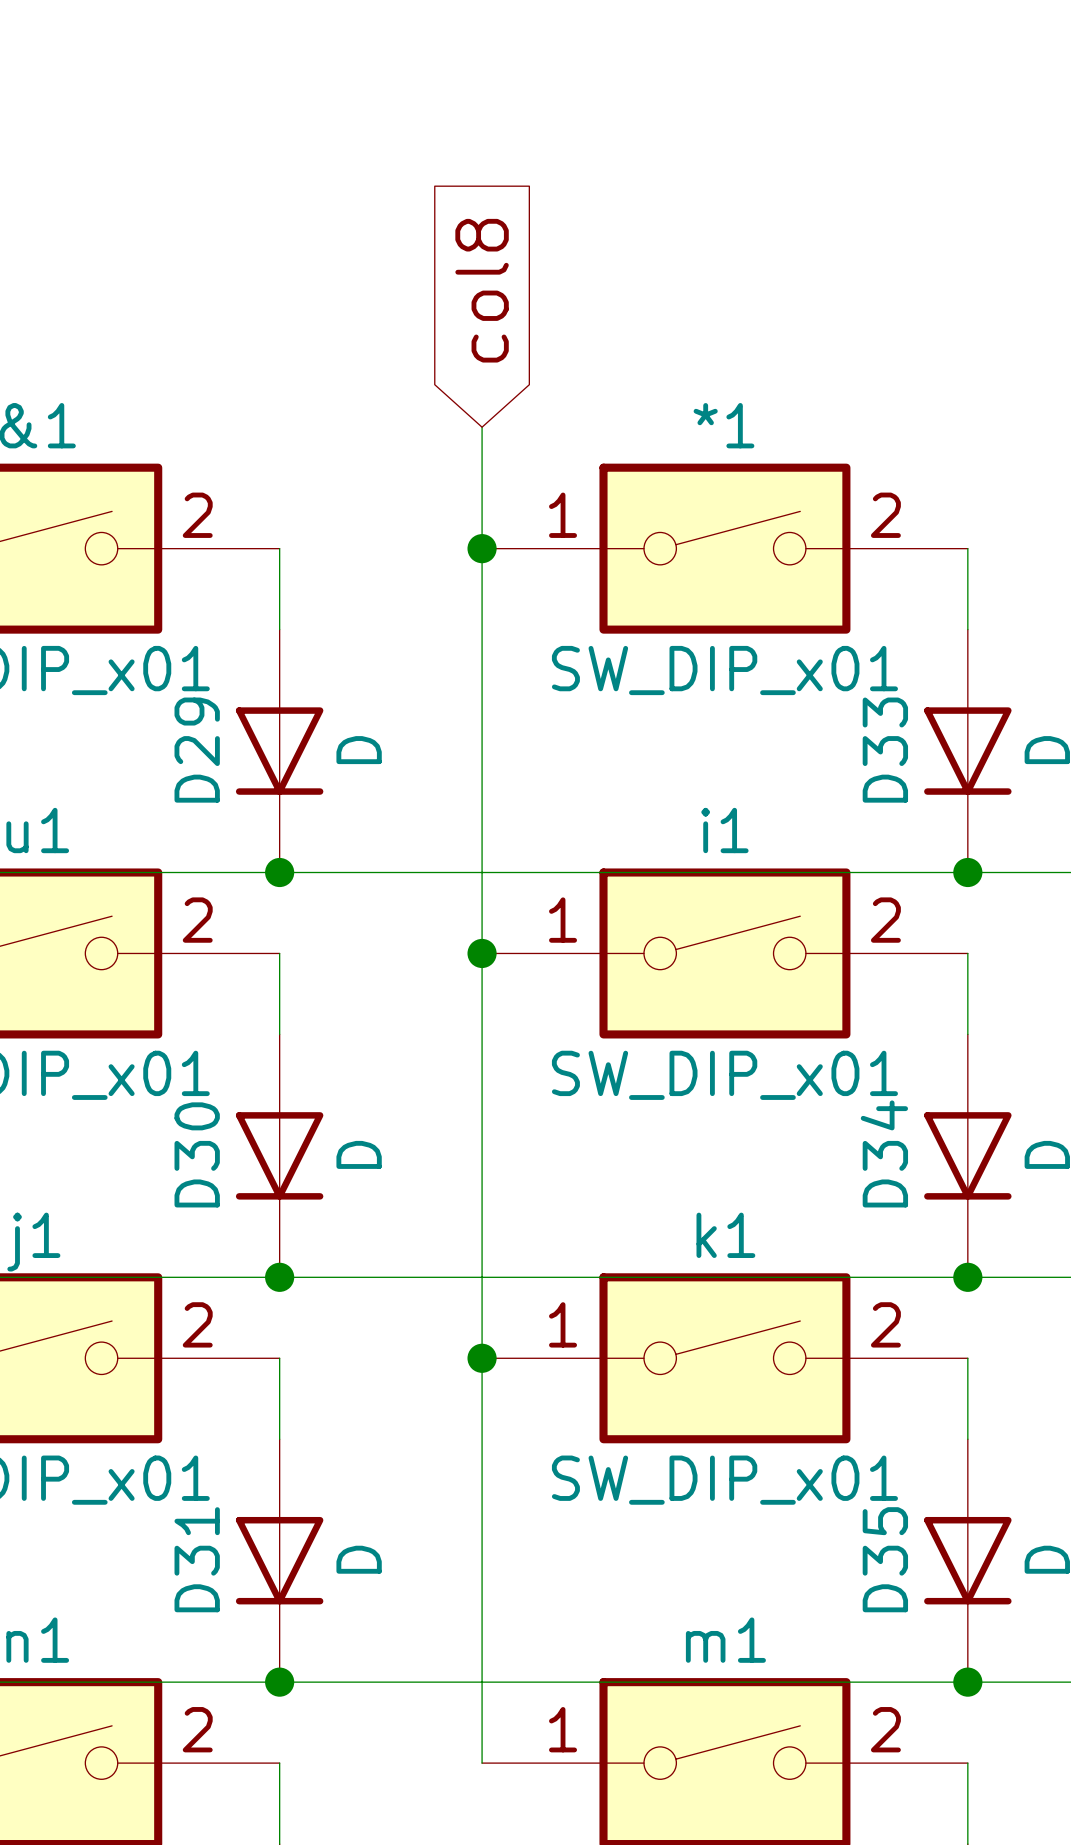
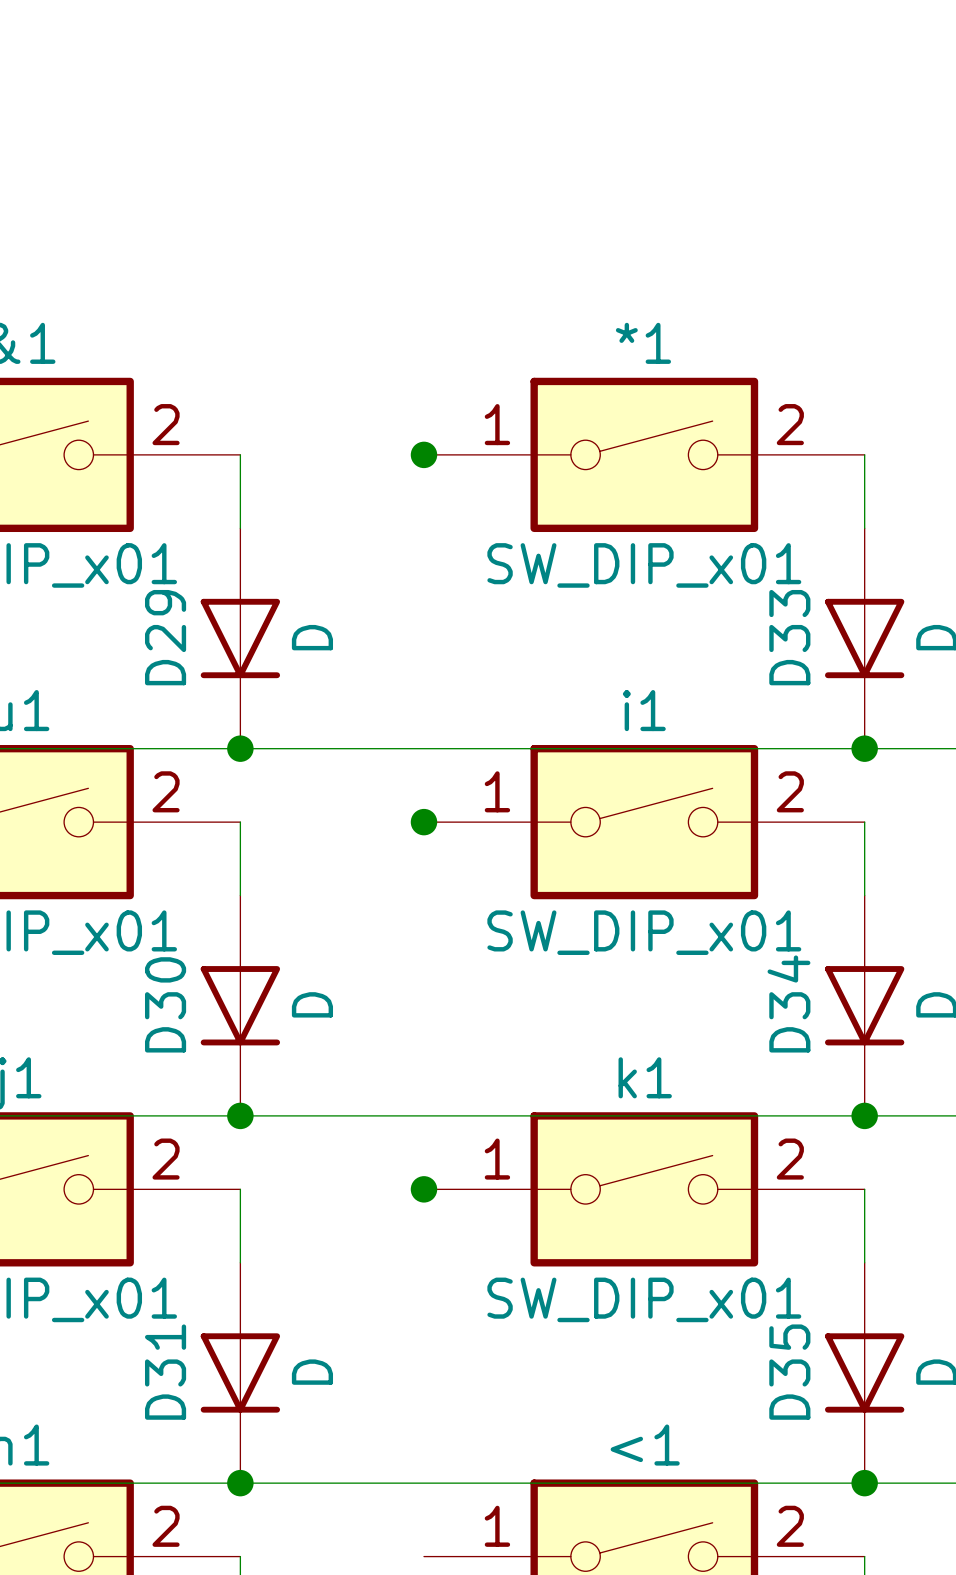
global label: col8 (482, 290) -> none
wire: (482, 427) (482, 1763) -> none
m1 name: m1 (725, 1640) -> <1 (645, 1445)

